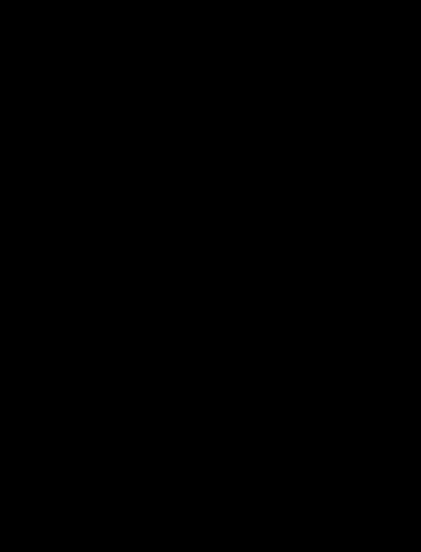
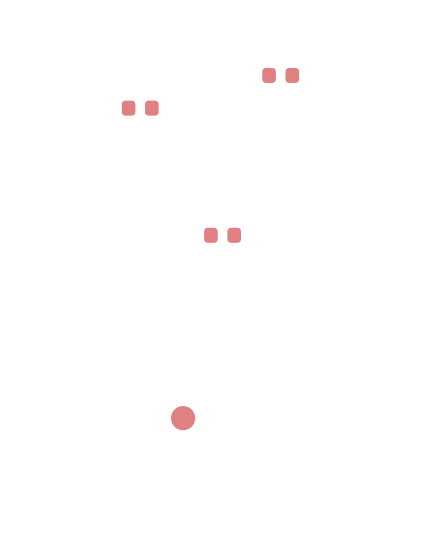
part: none -> (280, 75)
part: none -> (140, 108)
part: none -> (222, 235)
part: none -> (183, 418)

